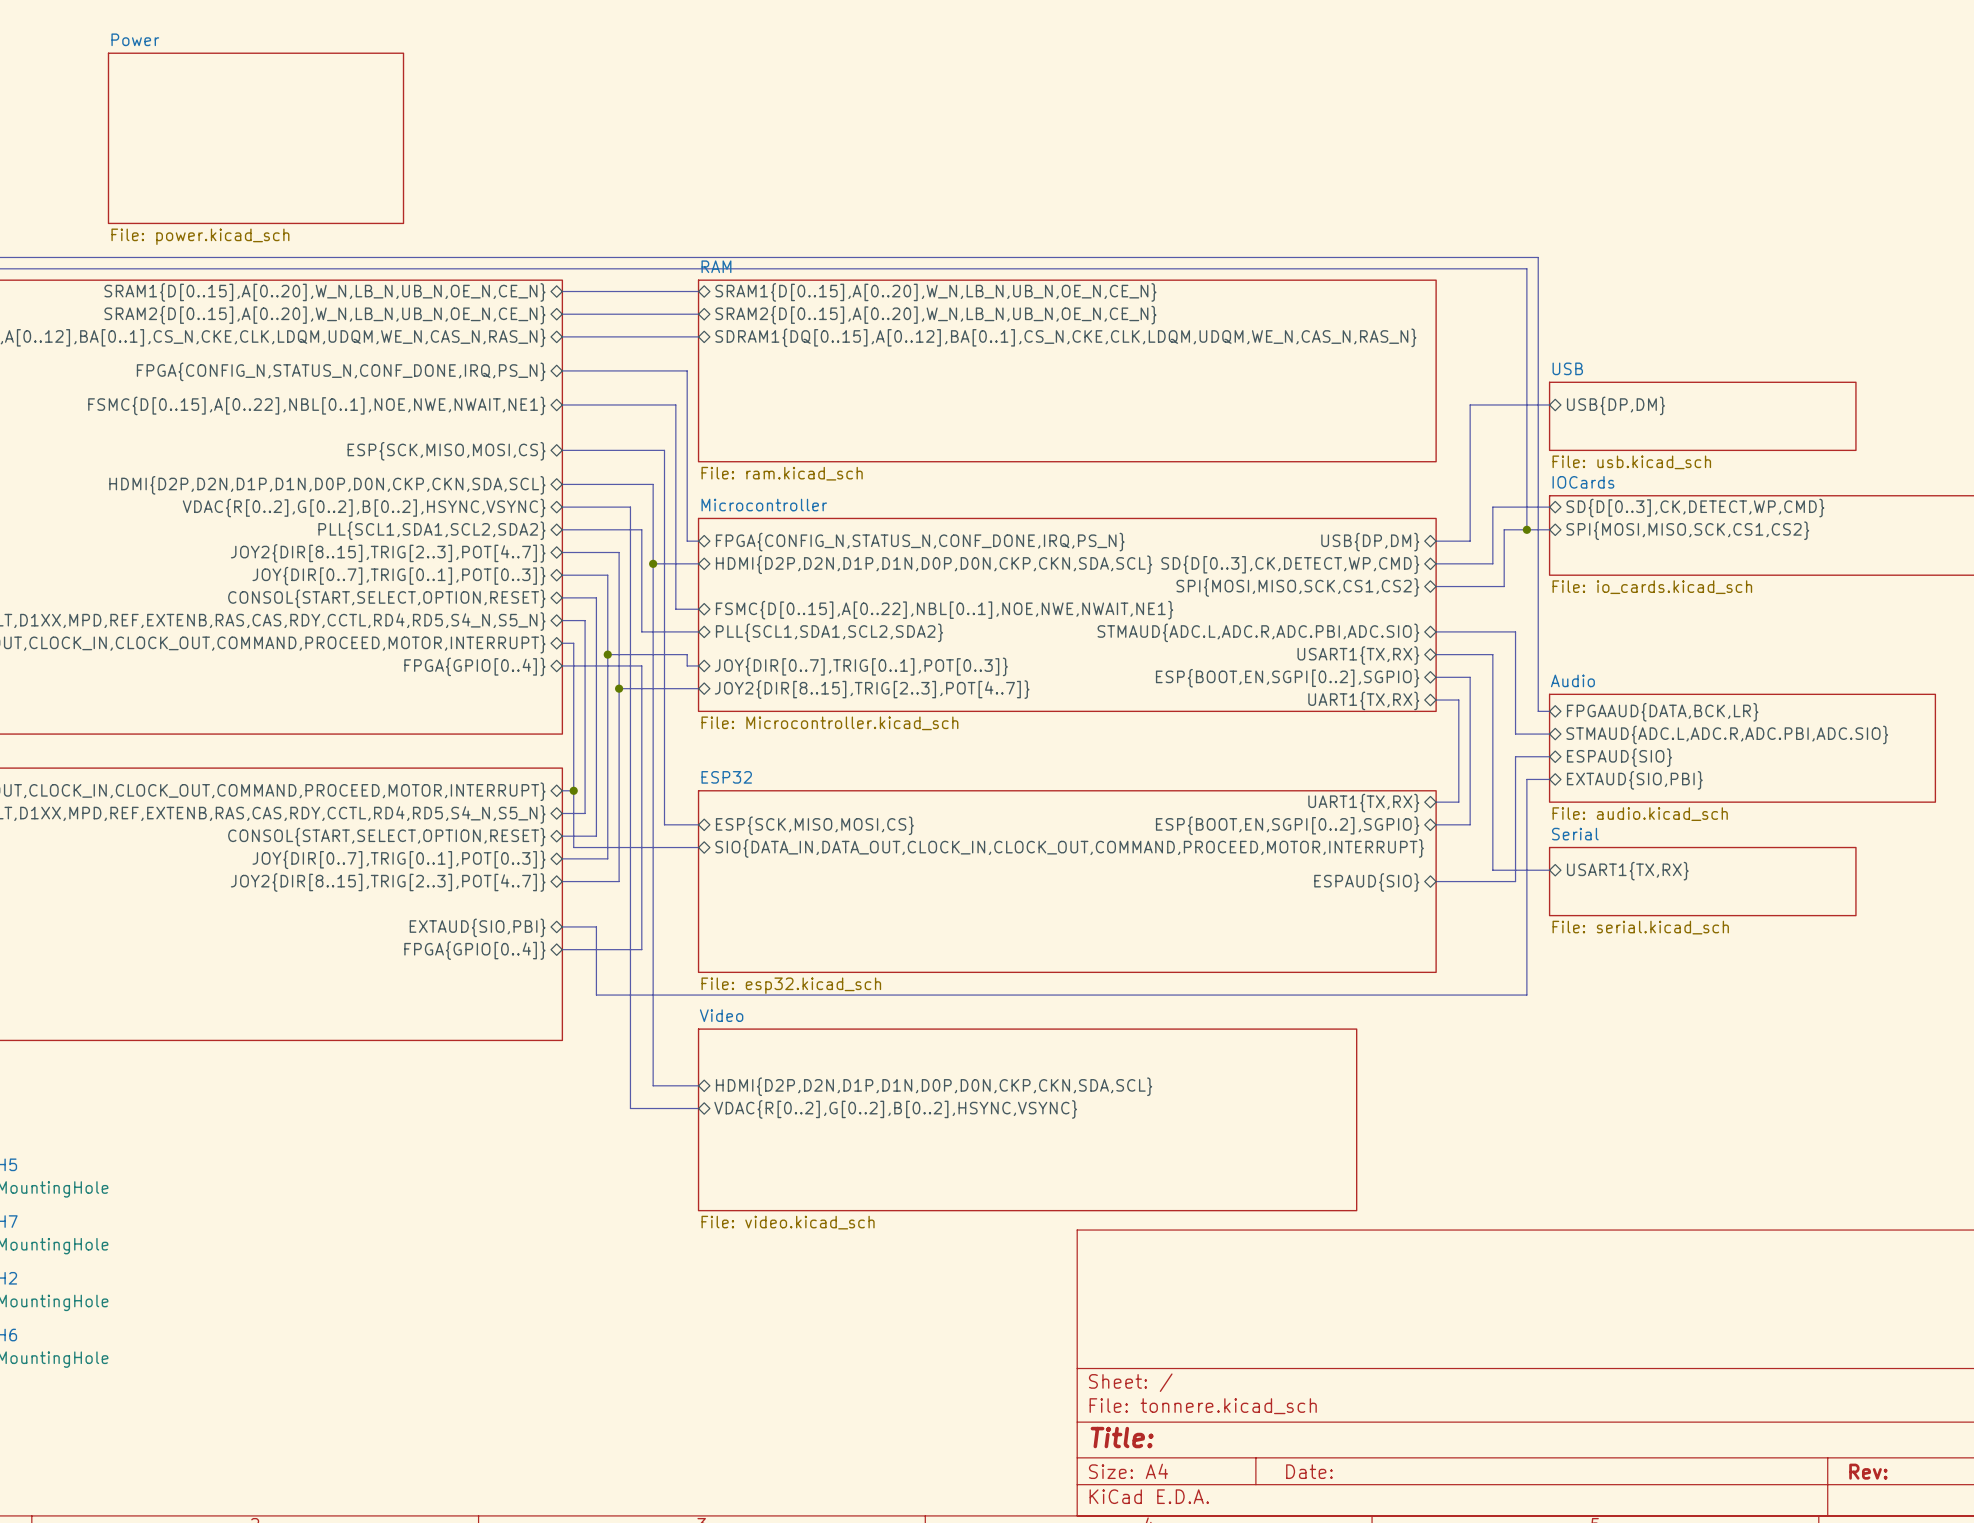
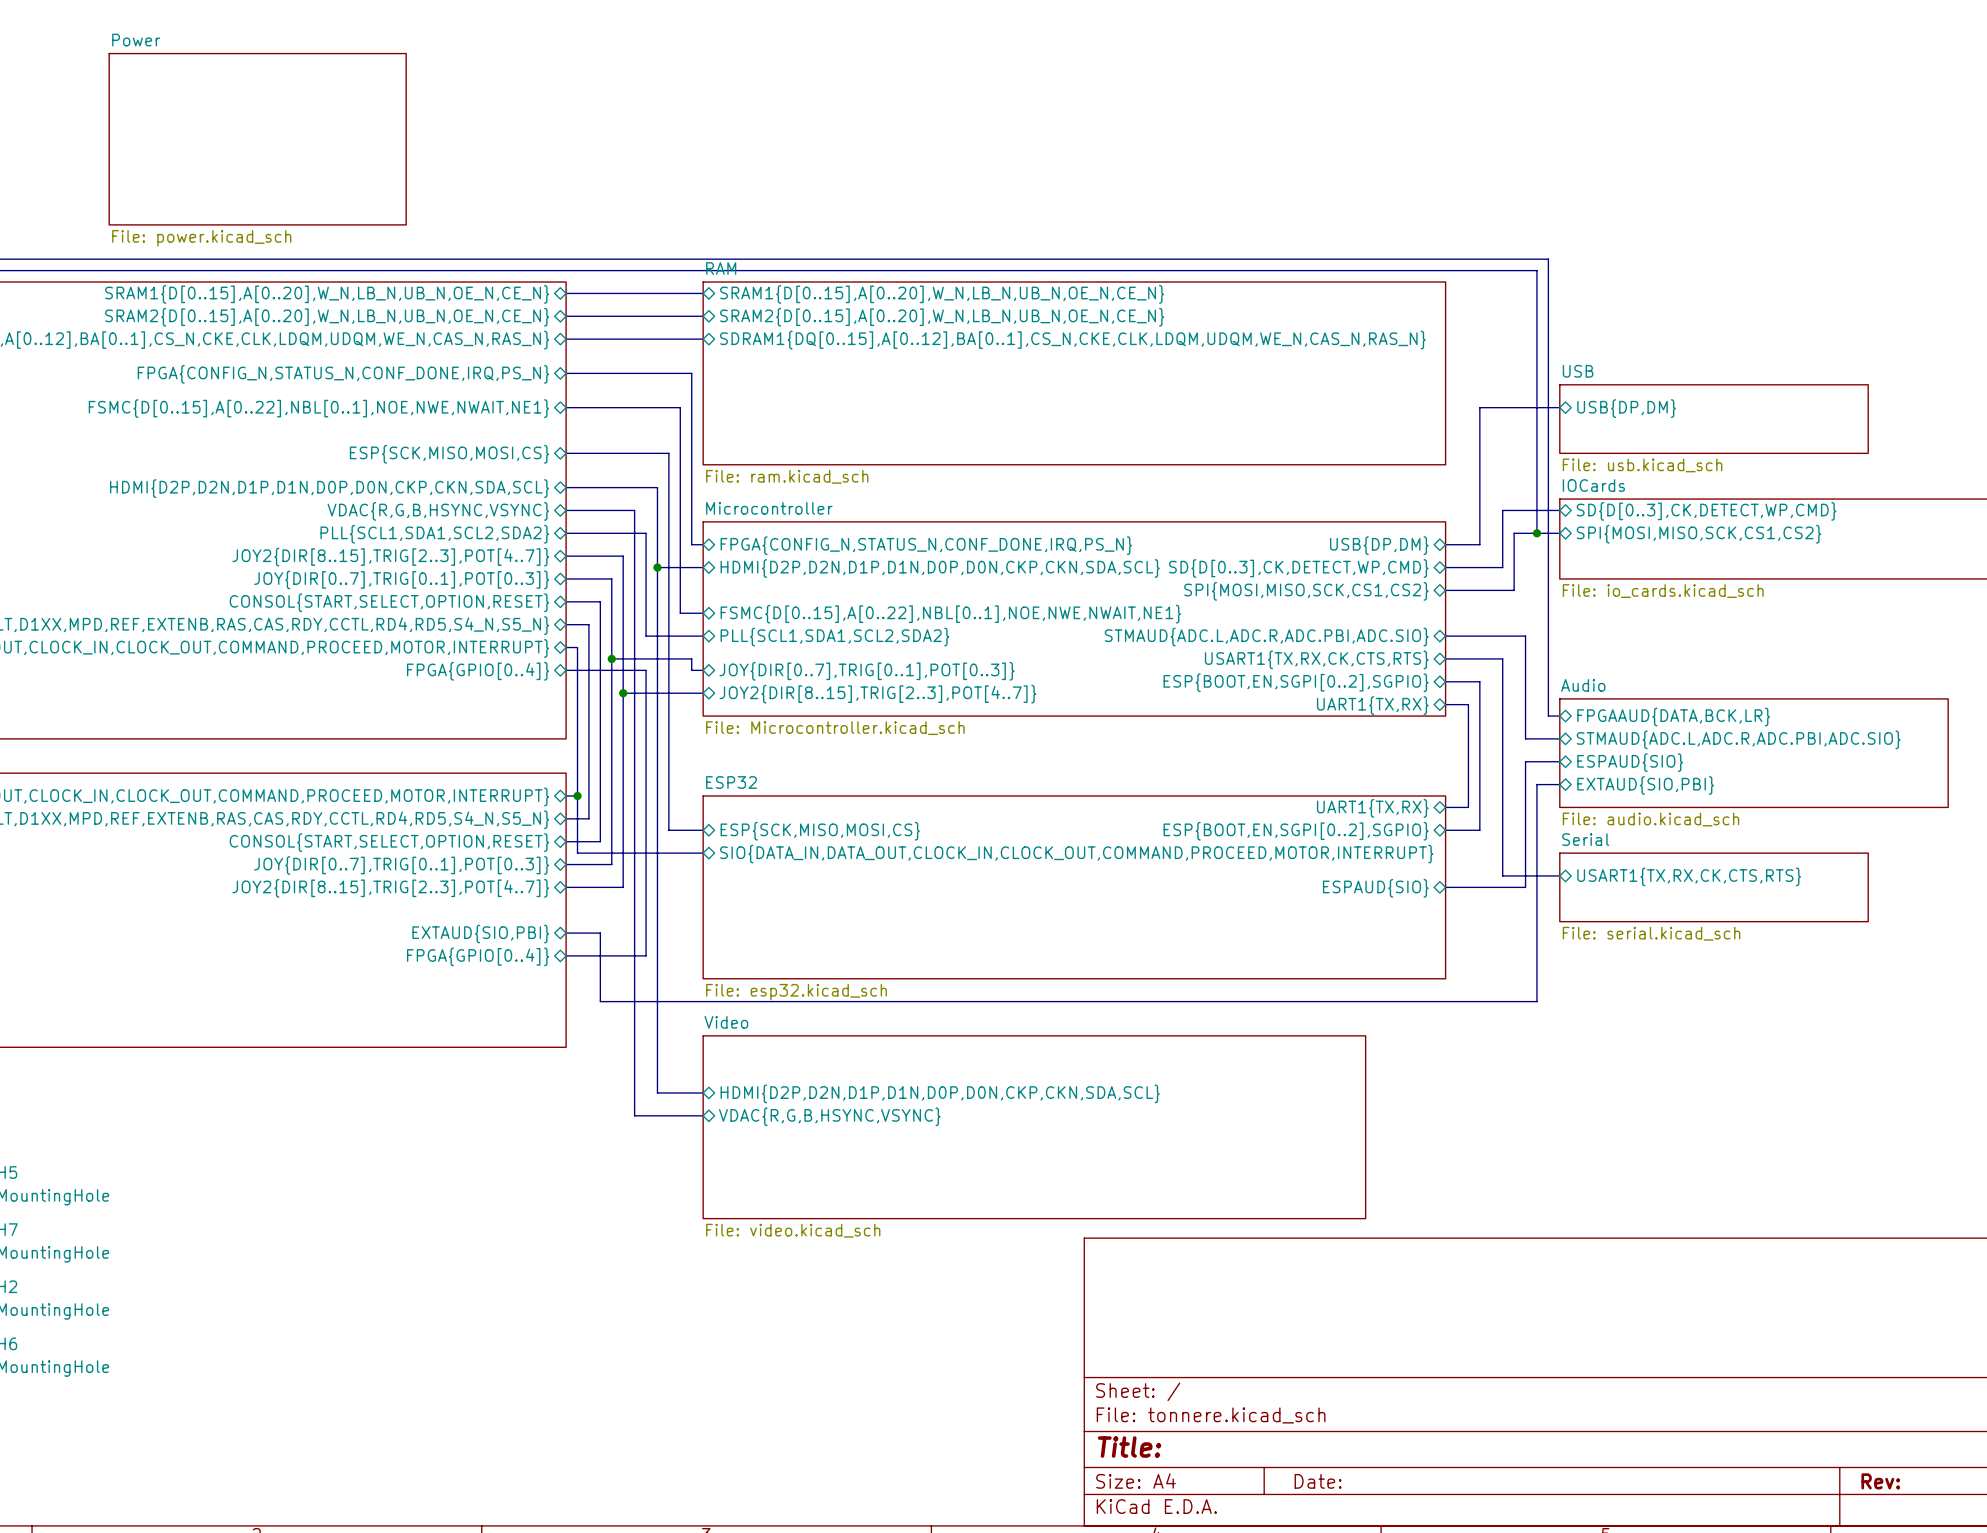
sheet pin: VDAC{R[0..2],G[0..2],B[0..2],HSYNC,VSYNC} (364, 508) -> VDAC{R,G,B,HSYNC,VSYNC} (438, 511)
sheet pin: USART1{TX,RX} (1358, 655) -> USART1{TX,RX,CK,CTS,RTS} (1316, 659)
sheet pin: USART1{TX,RX} (1627, 871) -> USART1{TX,RX,CK,CTS,RTS} (1689, 876)
sheet pin: VDAC{R[0..2],G[0..2],B[0..2],HSYNC,VSYNC} (895, 1109) -> VDAC{R,G,B,HSYNC,VSYNC} (829, 1116)

